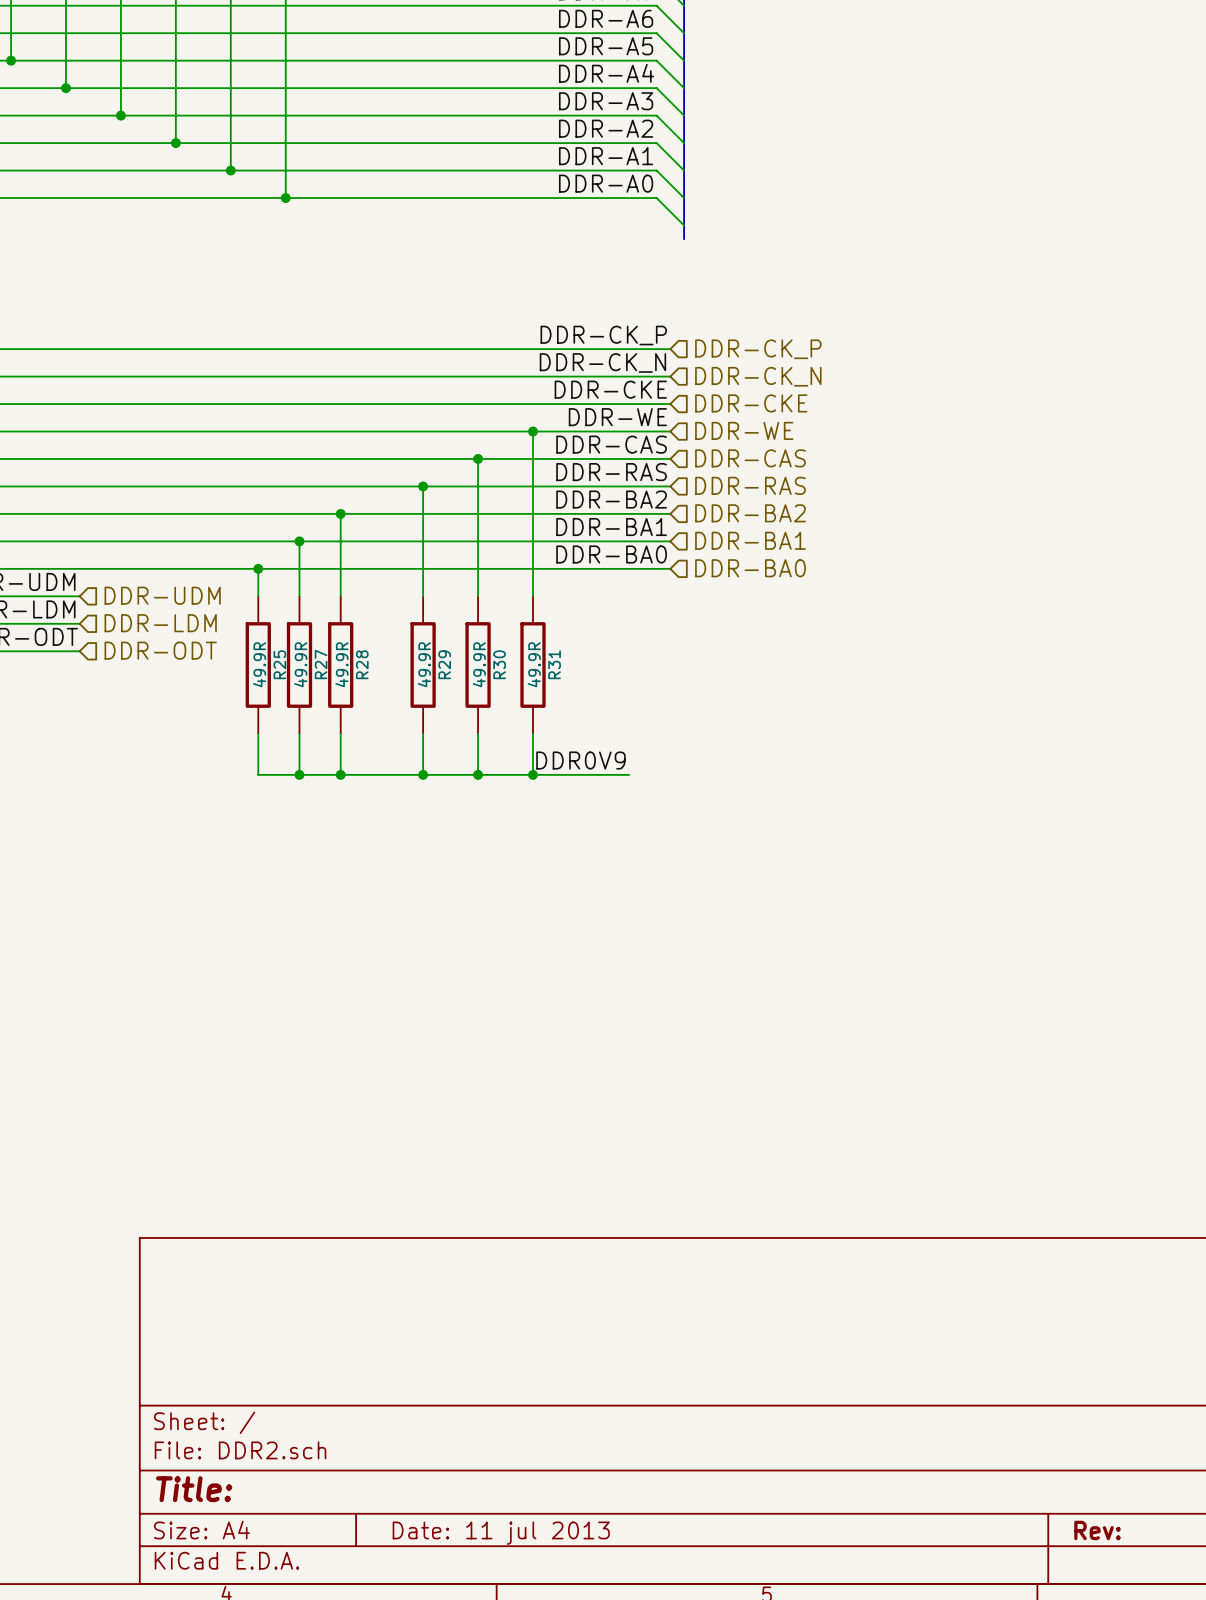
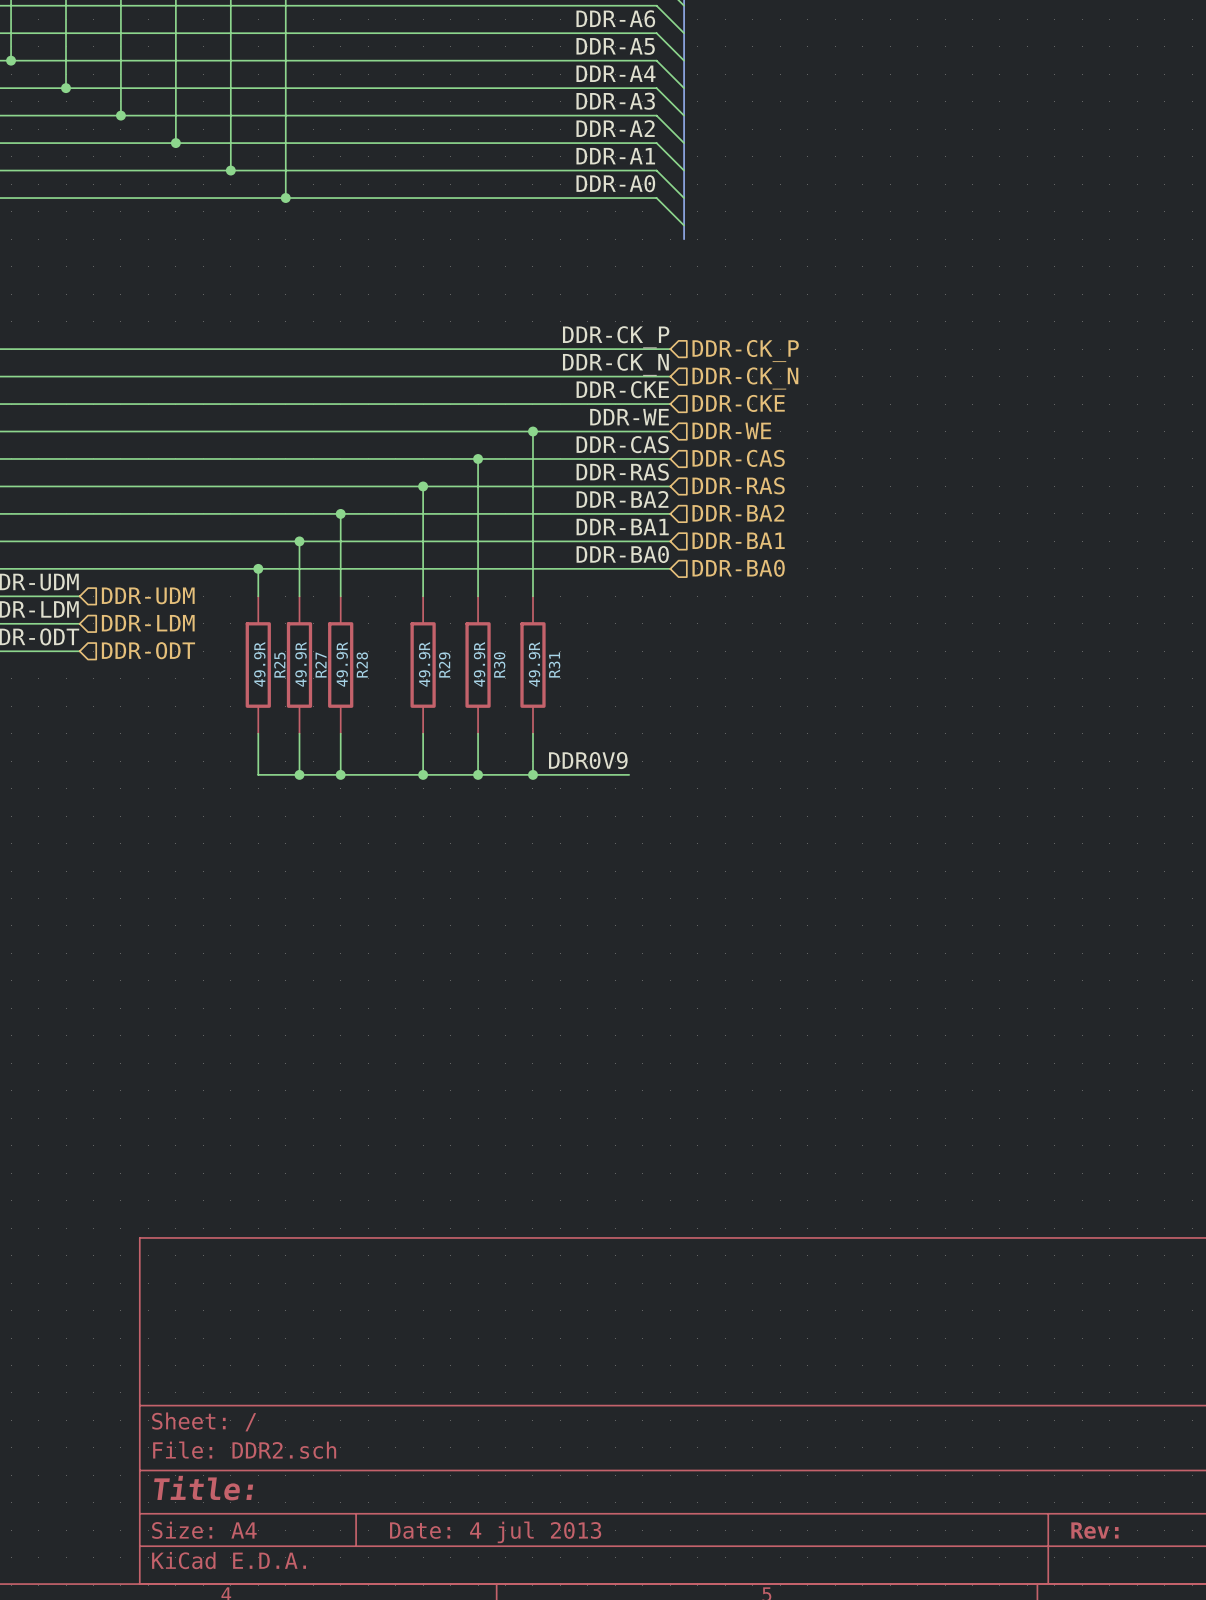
title block: Date: 11 jul 2013 (501, 1533) -> Date: 4 jul 2013 (495, 1532)

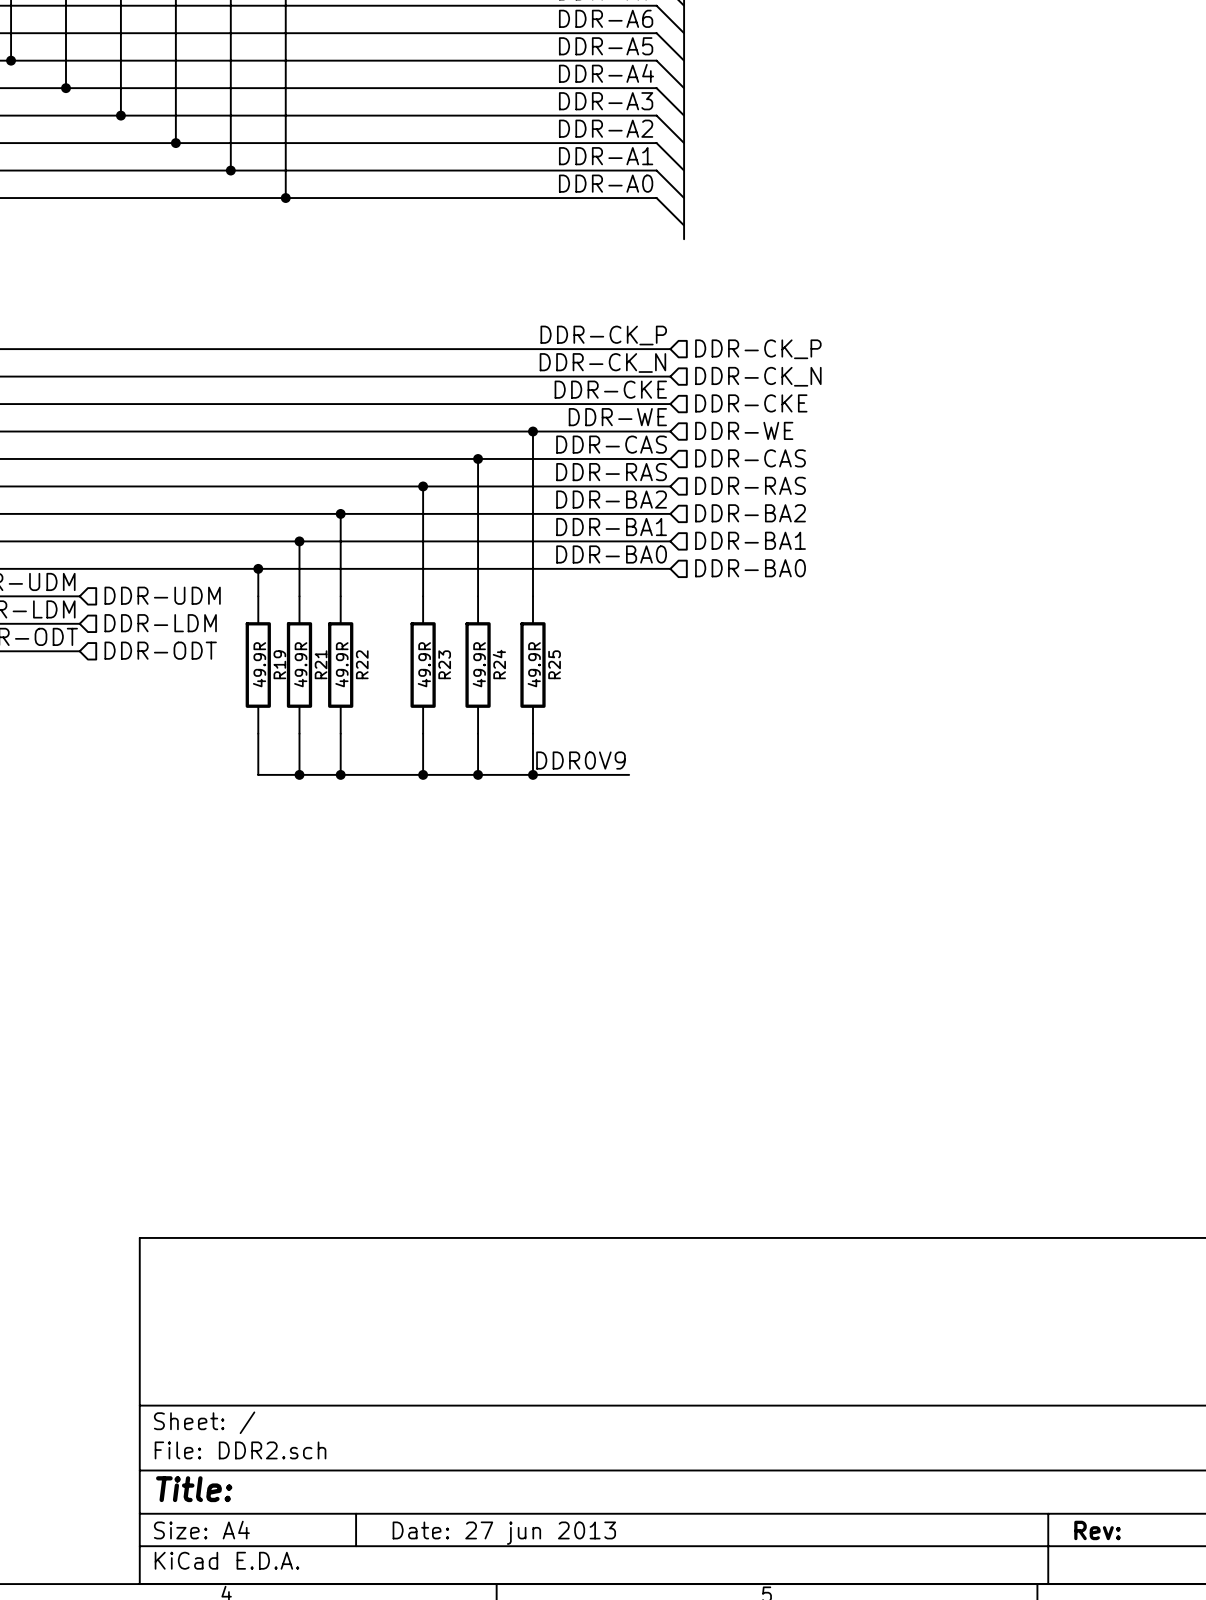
R28 name: R28 (362, 664) -> R22 (362, 664)
R30 name: R30 (499, 664) -> R24 (499, 664)
R25 name: R25 (279, 665) -> R19 (279, 664)
R27 name: R27 (320, 665) -> R21 (321, 664)
R29 name: R29 (444, 665) -> R23 (444, 664)
R31 name: R31 (554, 665) -> R25 (554, 664)
title block: Date: 4 jul 2013 (495, 1532) -> Date: 27 jun 2013 (504, 1533)

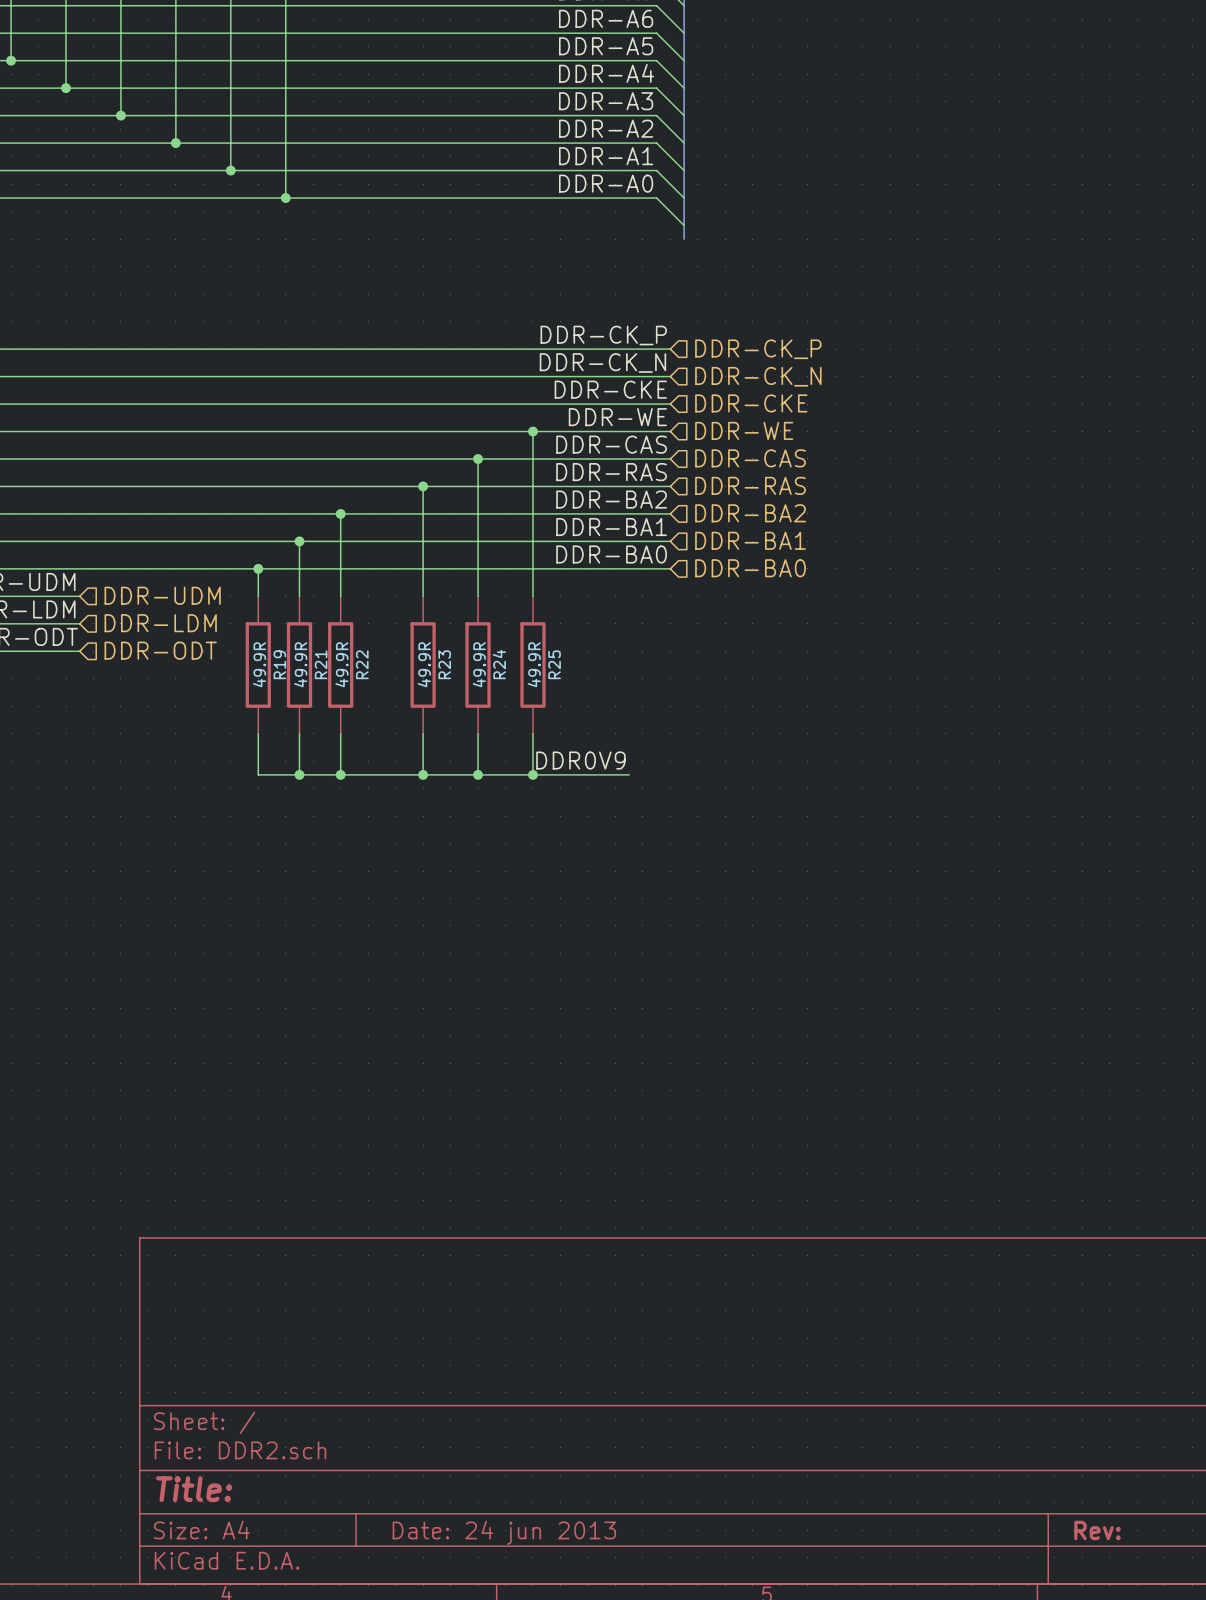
title block: Date: 27 jun 2013 (504, 1533) -> Date: 24 jun 2013 (504, 1532)

